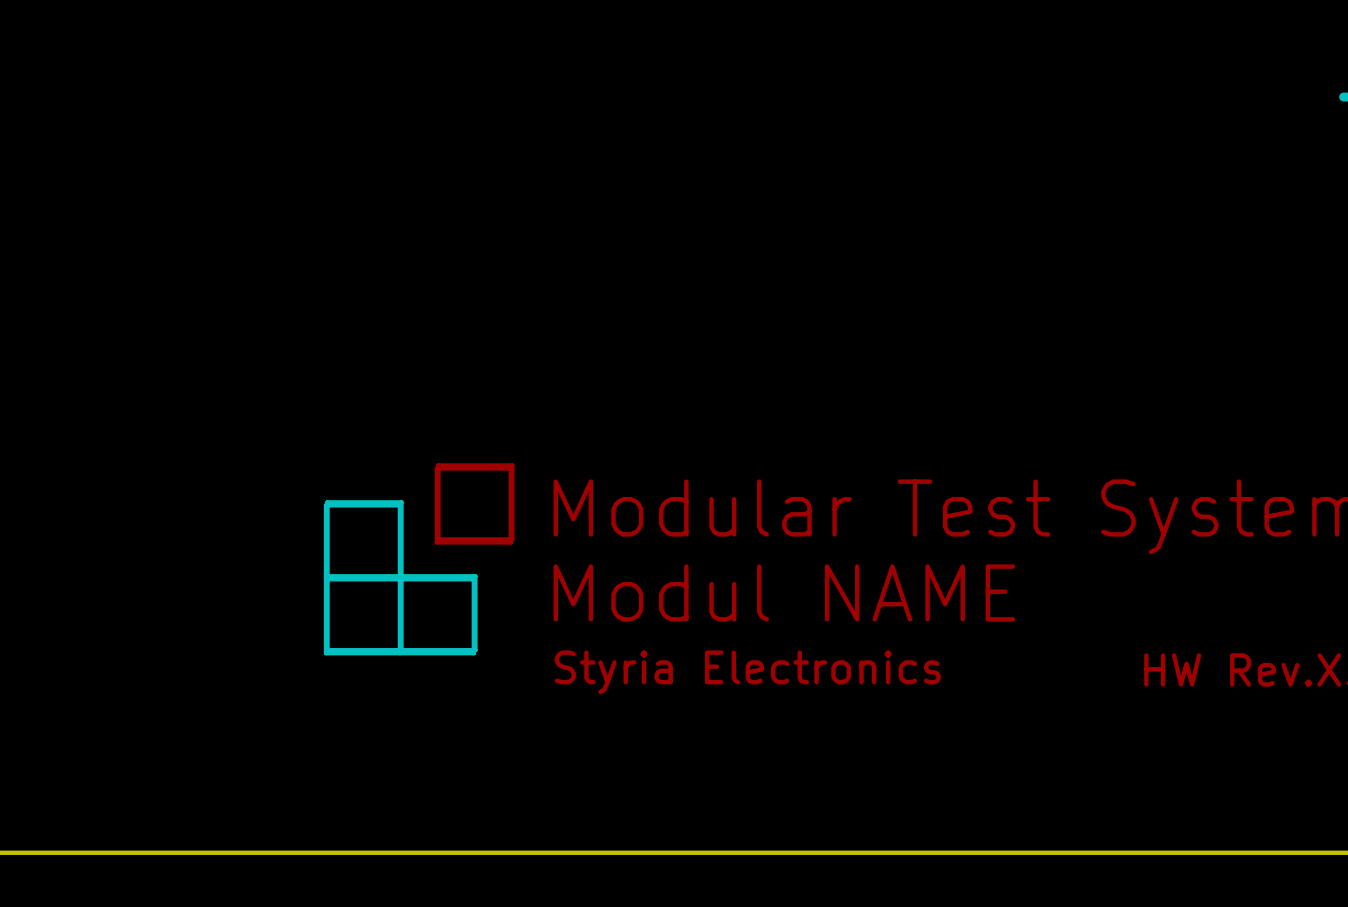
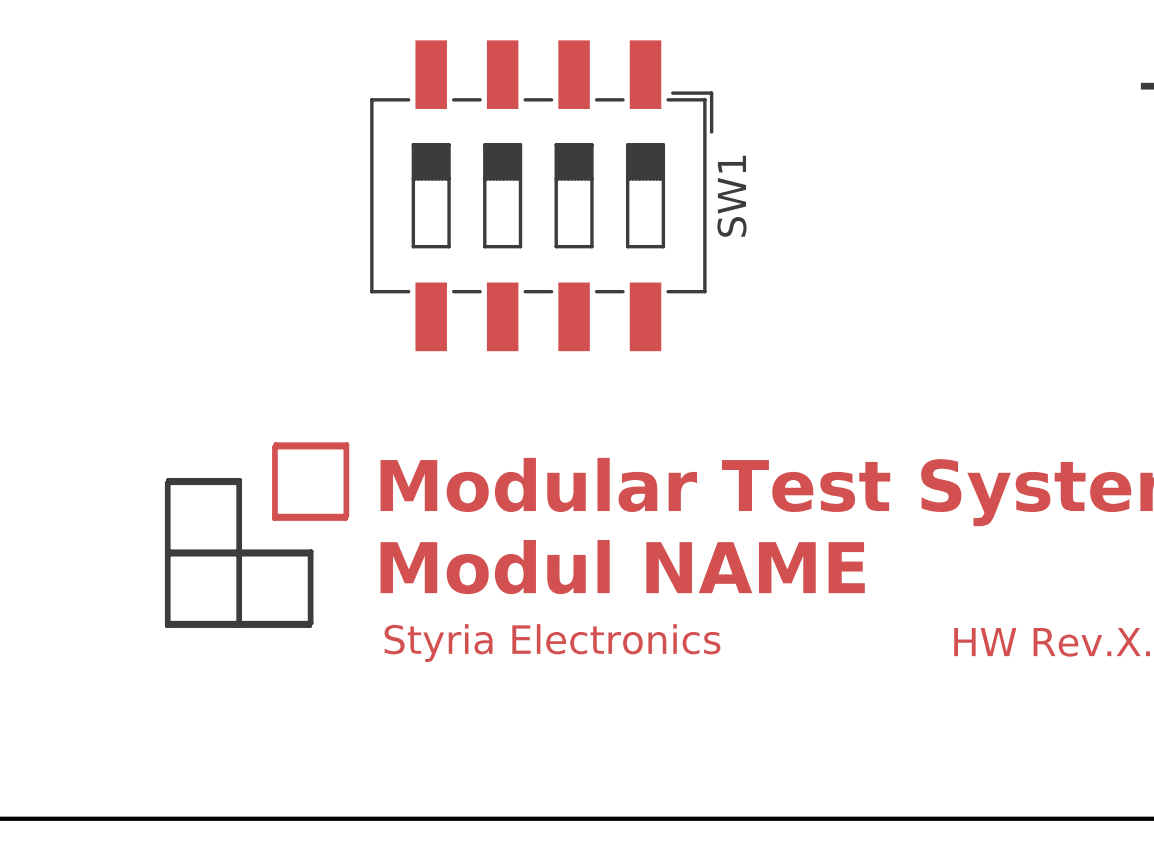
SW1: none -> (541, 195)

